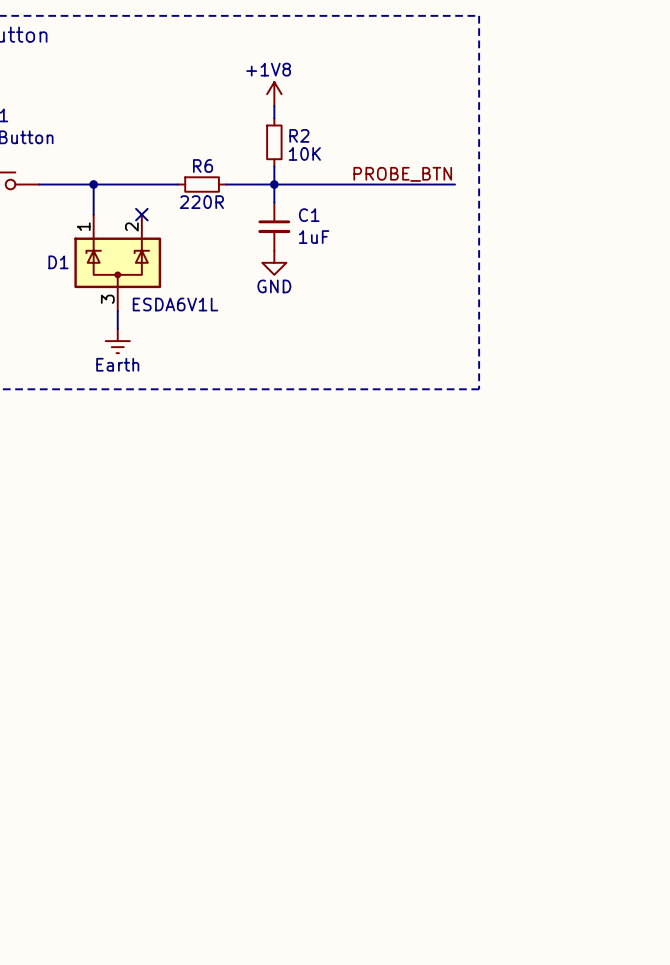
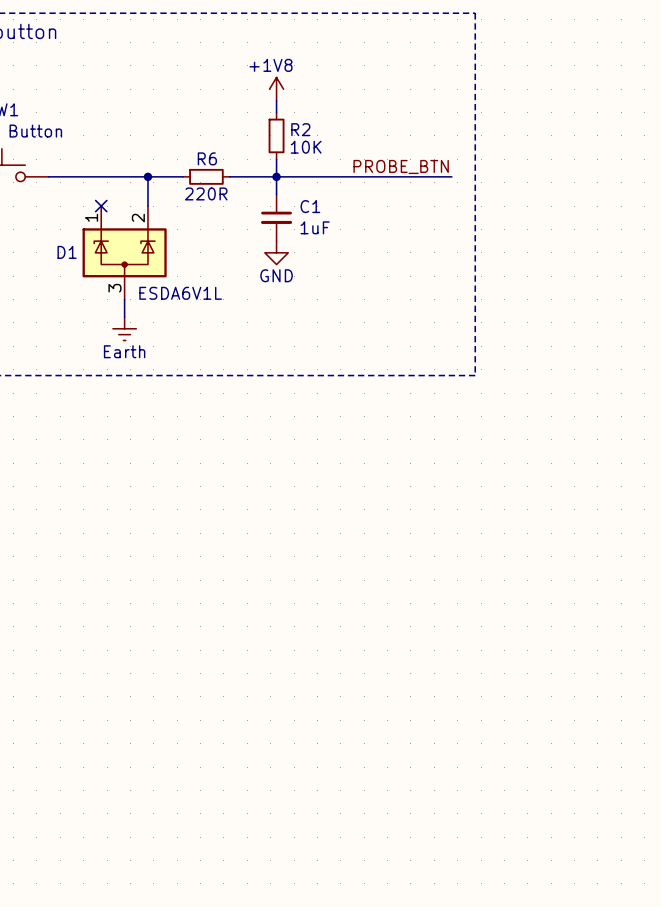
wire: (93, 184) (93, 214) -> (147, 176) (147, 206)
junction position: (93, 184) -> (147, 176)
no-connect mark position: (141, 214) -> (101, 206)

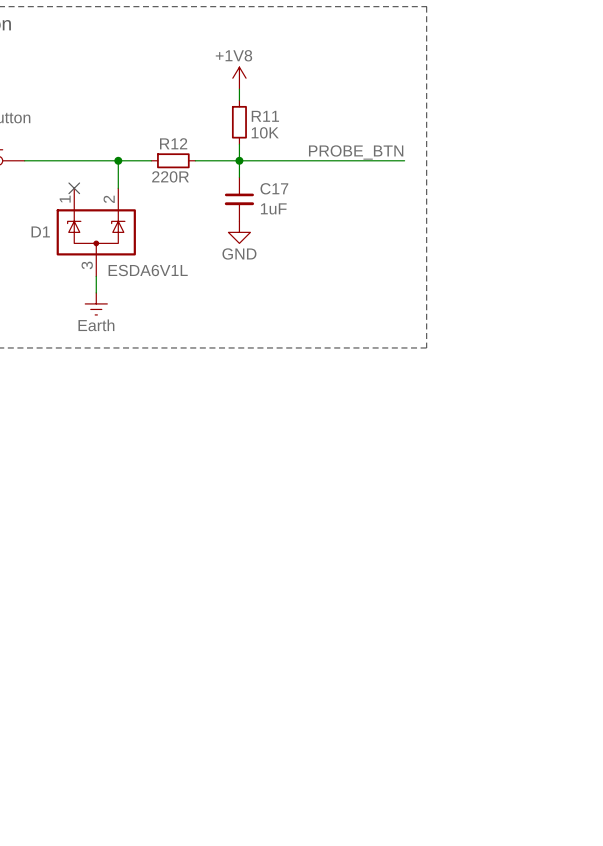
R2 name: R2 (300, 129) -> R11 (265, 116)
R6 name: R6 (207, 158) -> R12 (173, 143)
C1 name: C1 (310, 206) -> C17 (274, 188)

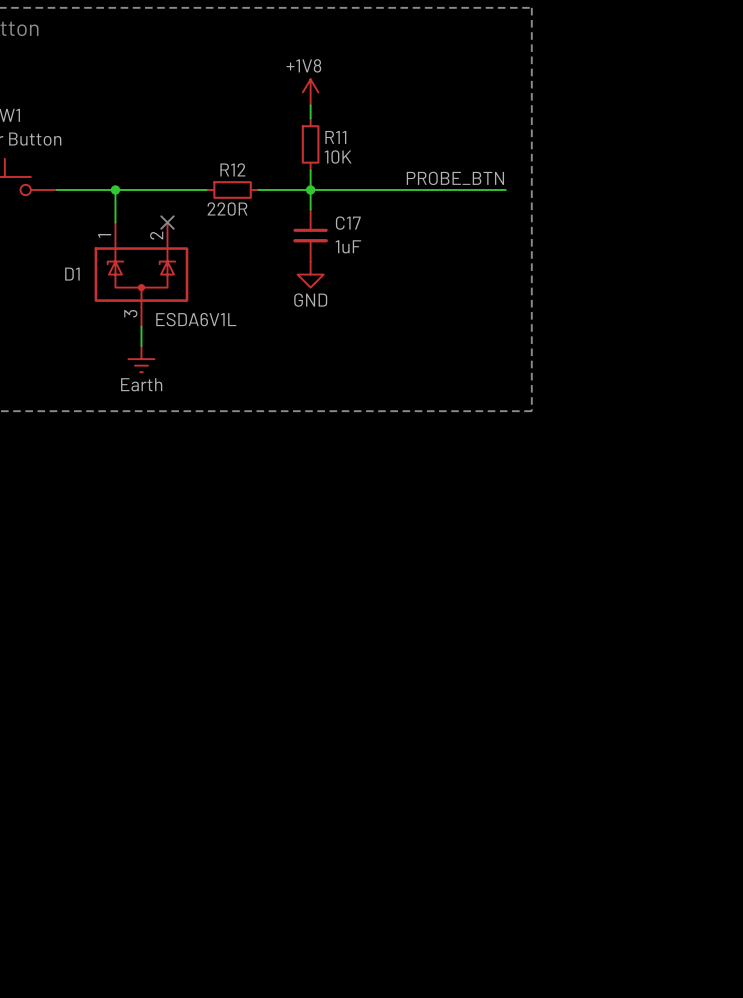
wire: (118, 160) (118, 188) -> (115, 190) (115, 222)
junction position: (118, 160) -> (115, 190)
no-connect mark position: (74, 188) -> (167, 222)

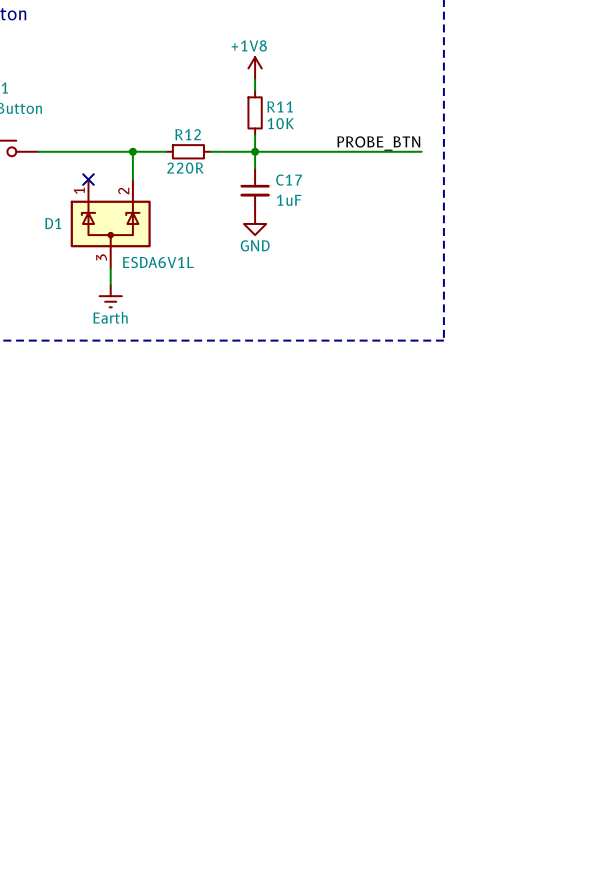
wire: (115, 190) (115, 222) -> (132, 151) (132, 179)
junction position: (115, 190) -> (132, 151)
no-connect mark position: (167, 222) -> (88, 179)

